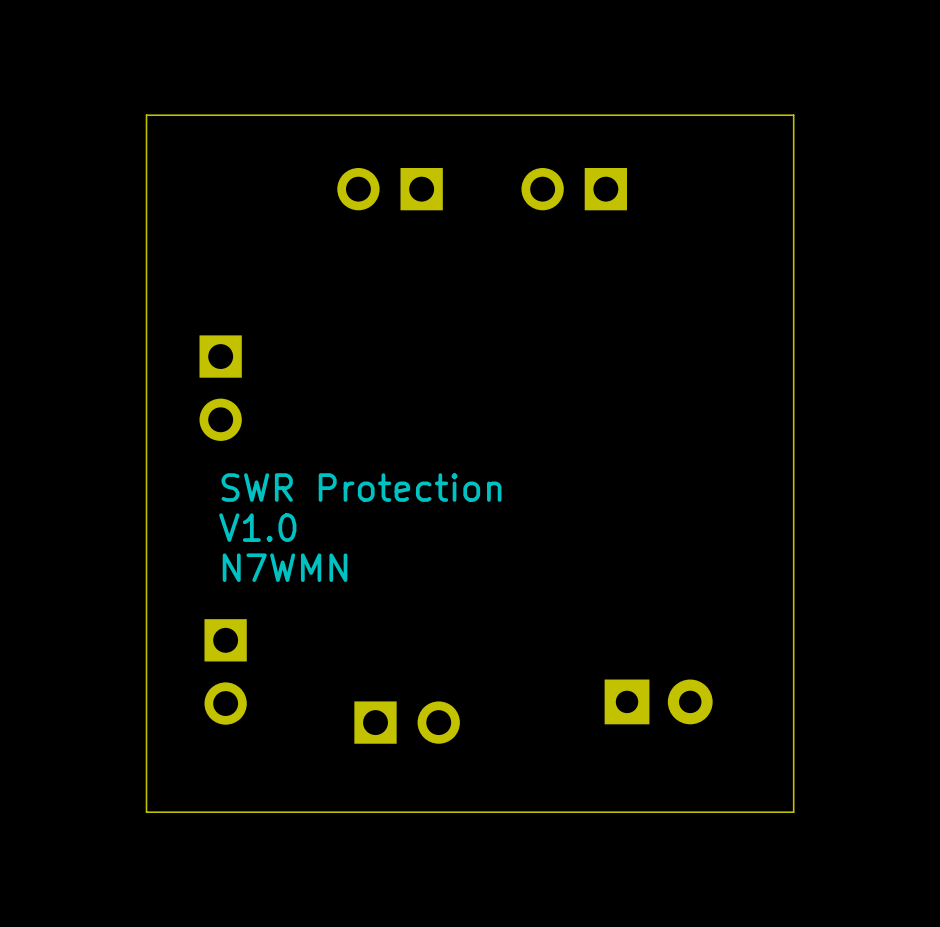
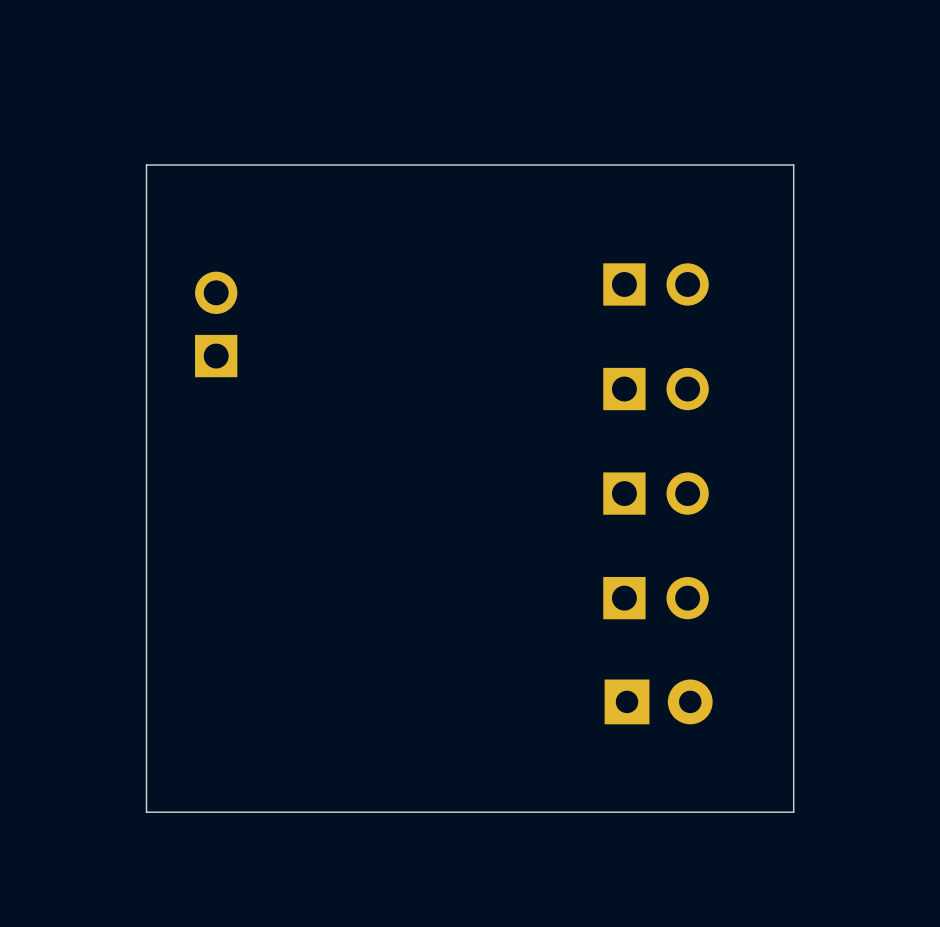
board edge: (793, 165) (793, 115) (146, 115) (146, 165) -> (793, 165) (146, 165)
part: (390, 189) -> none
part: (574, 189) -> none
part: none -> (656, 284)
part rotation: 0° (220, 388) -> 180° (216, 324)
part position: (220, 388) -> (216, 324)
part: none -> (656, 389)
text: SWR Protection (361, 487) -> none
part: none -> (656, 493)
text: V1.0 (257, 527) -> none
text: N7WMN (285, 567) -> none
part: none -> (656, 598)
part: (225, 671) -> none
part: (407, 722) -> none

